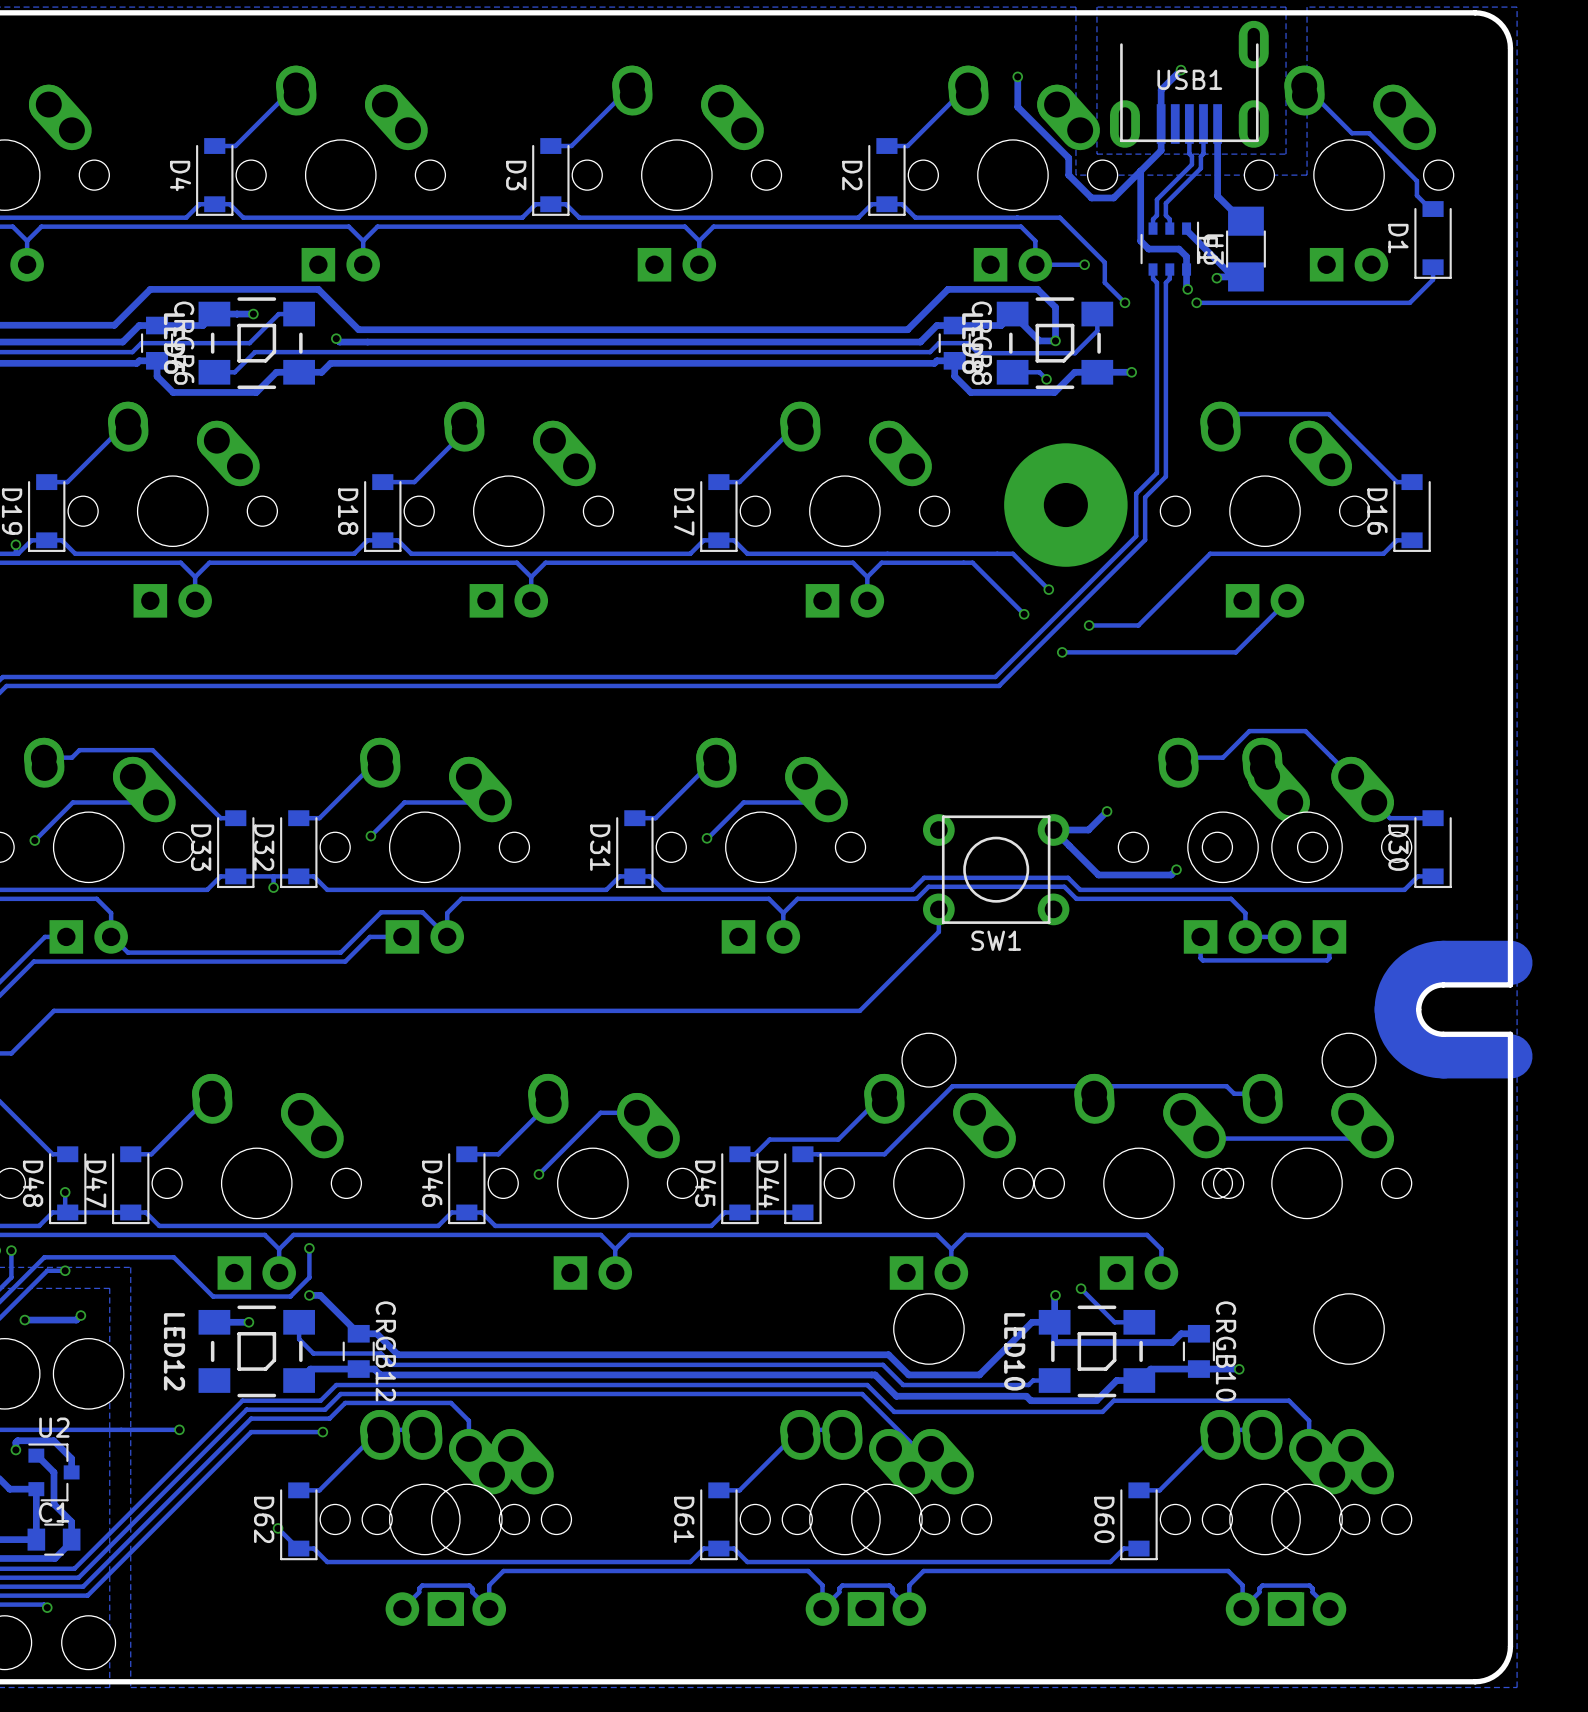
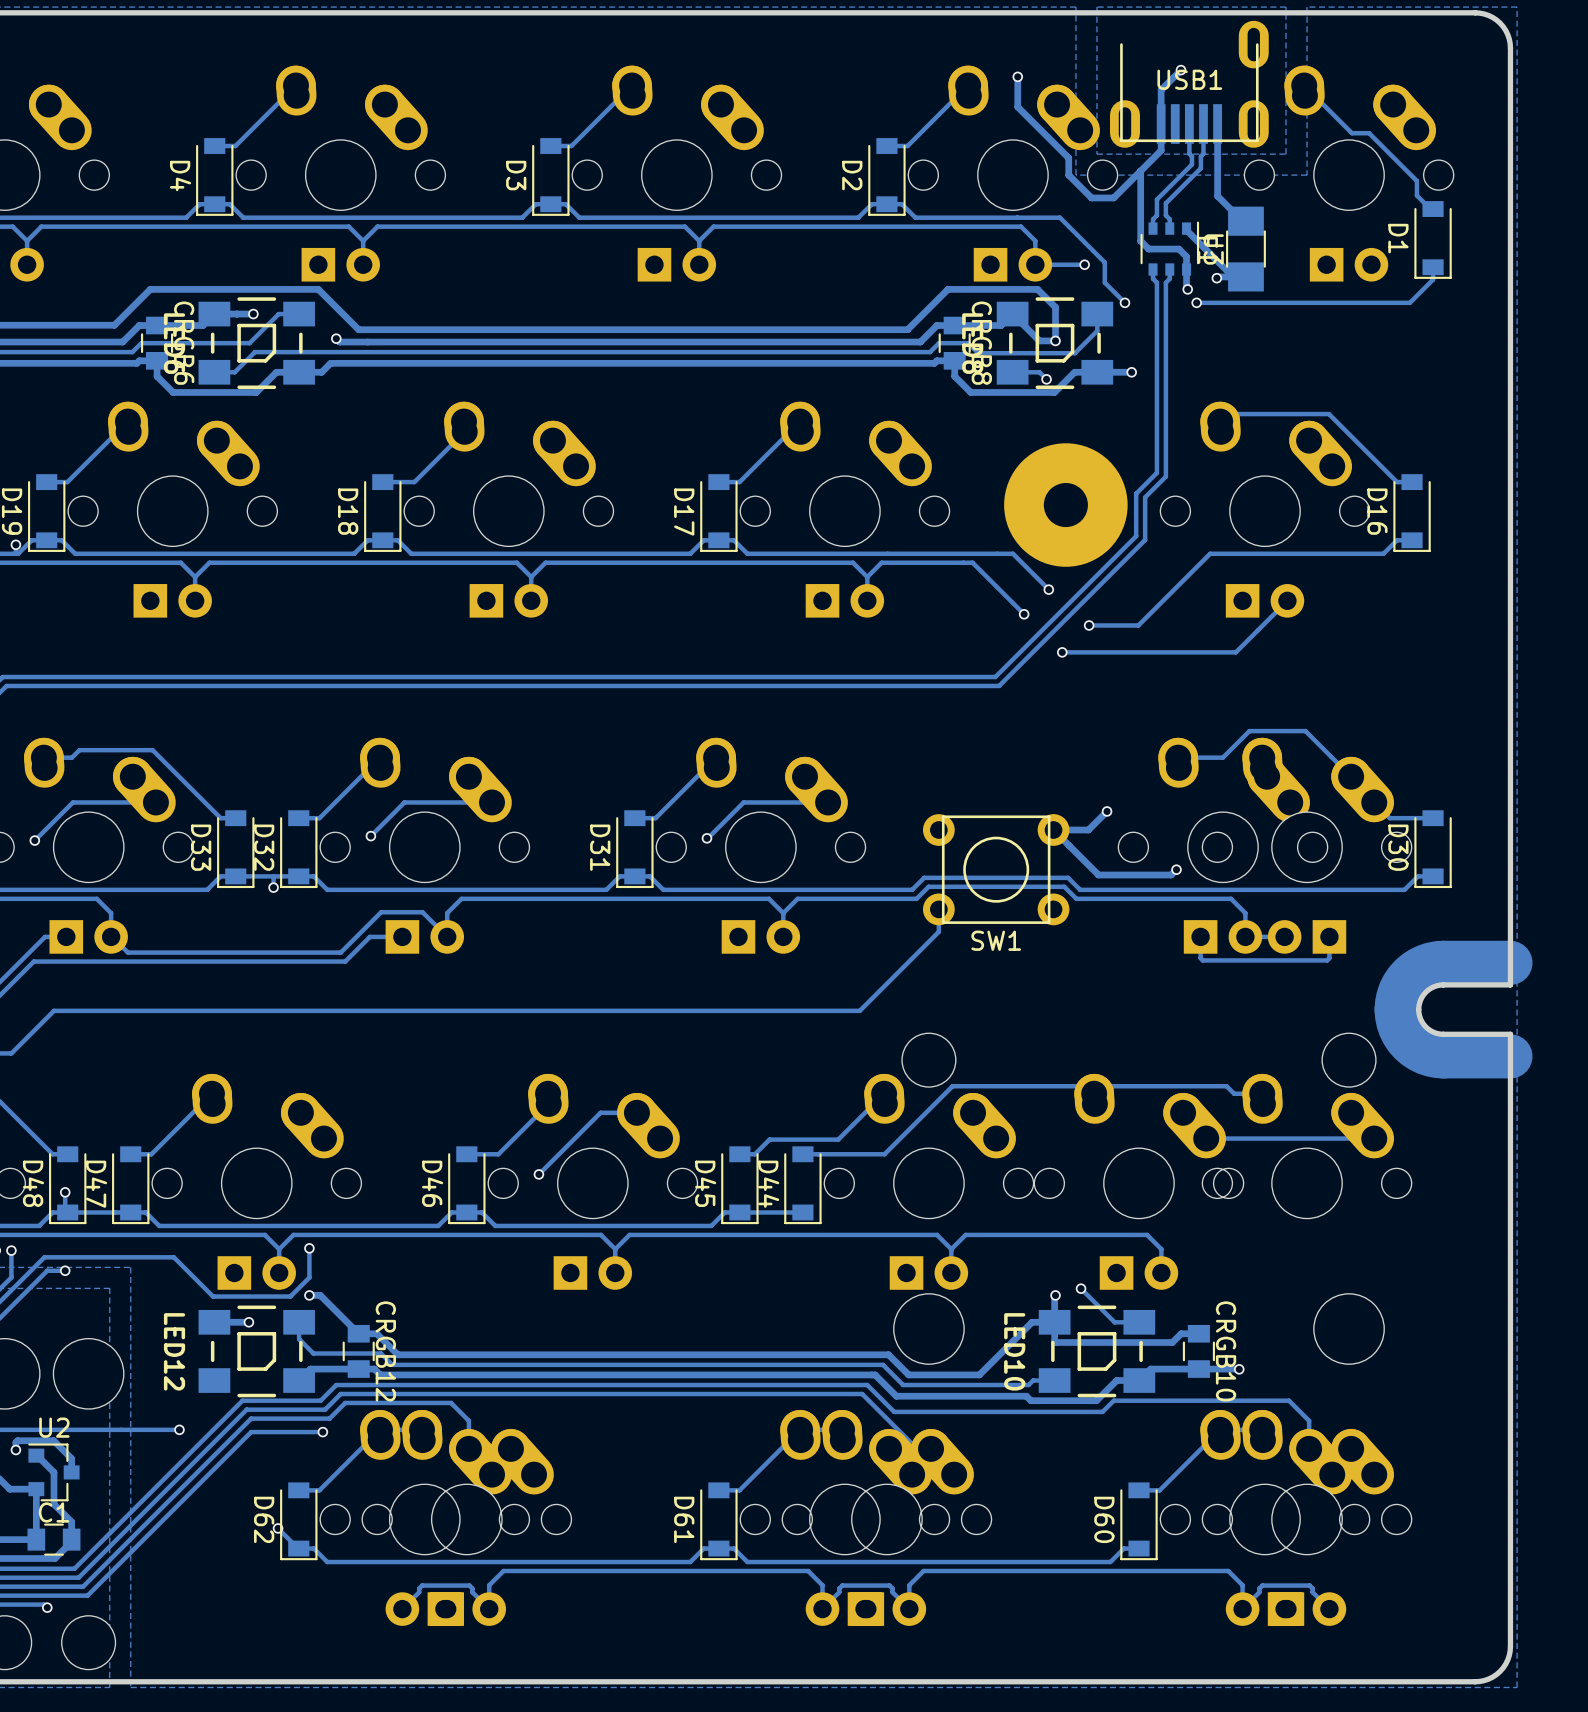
track: (80, 1315) (76, 1320) (24, 1320) -> none
via: (80, 1315) -> none
via: (24, 1320) -> none

